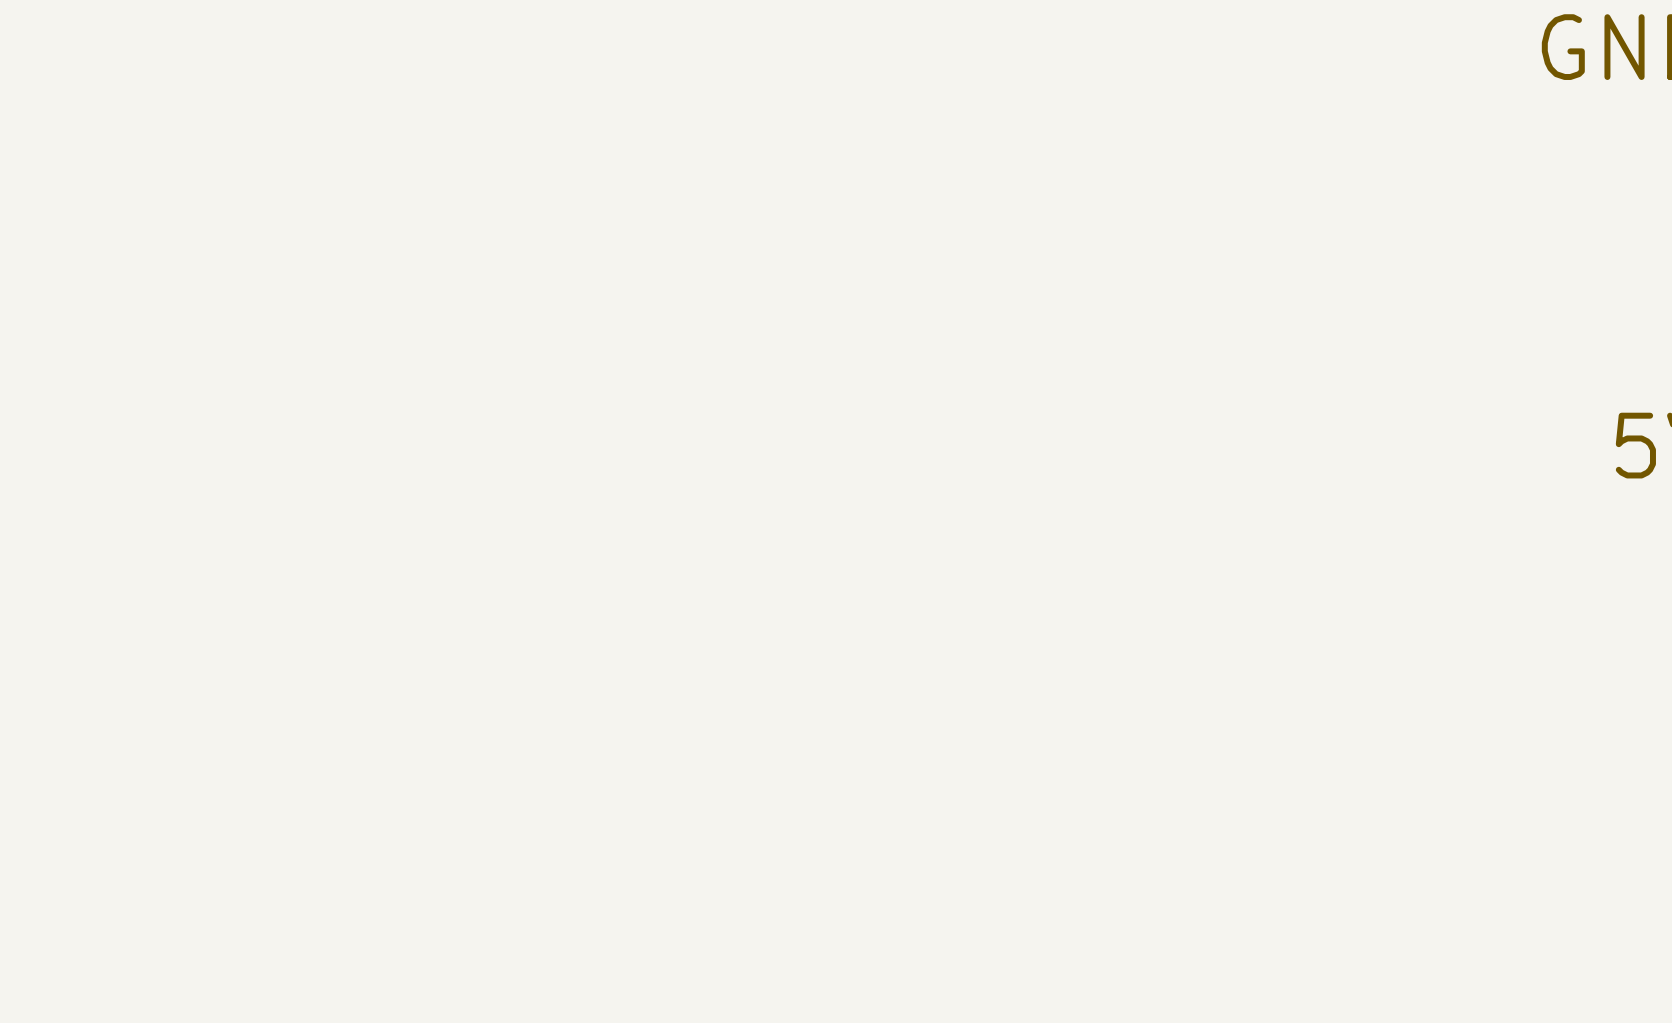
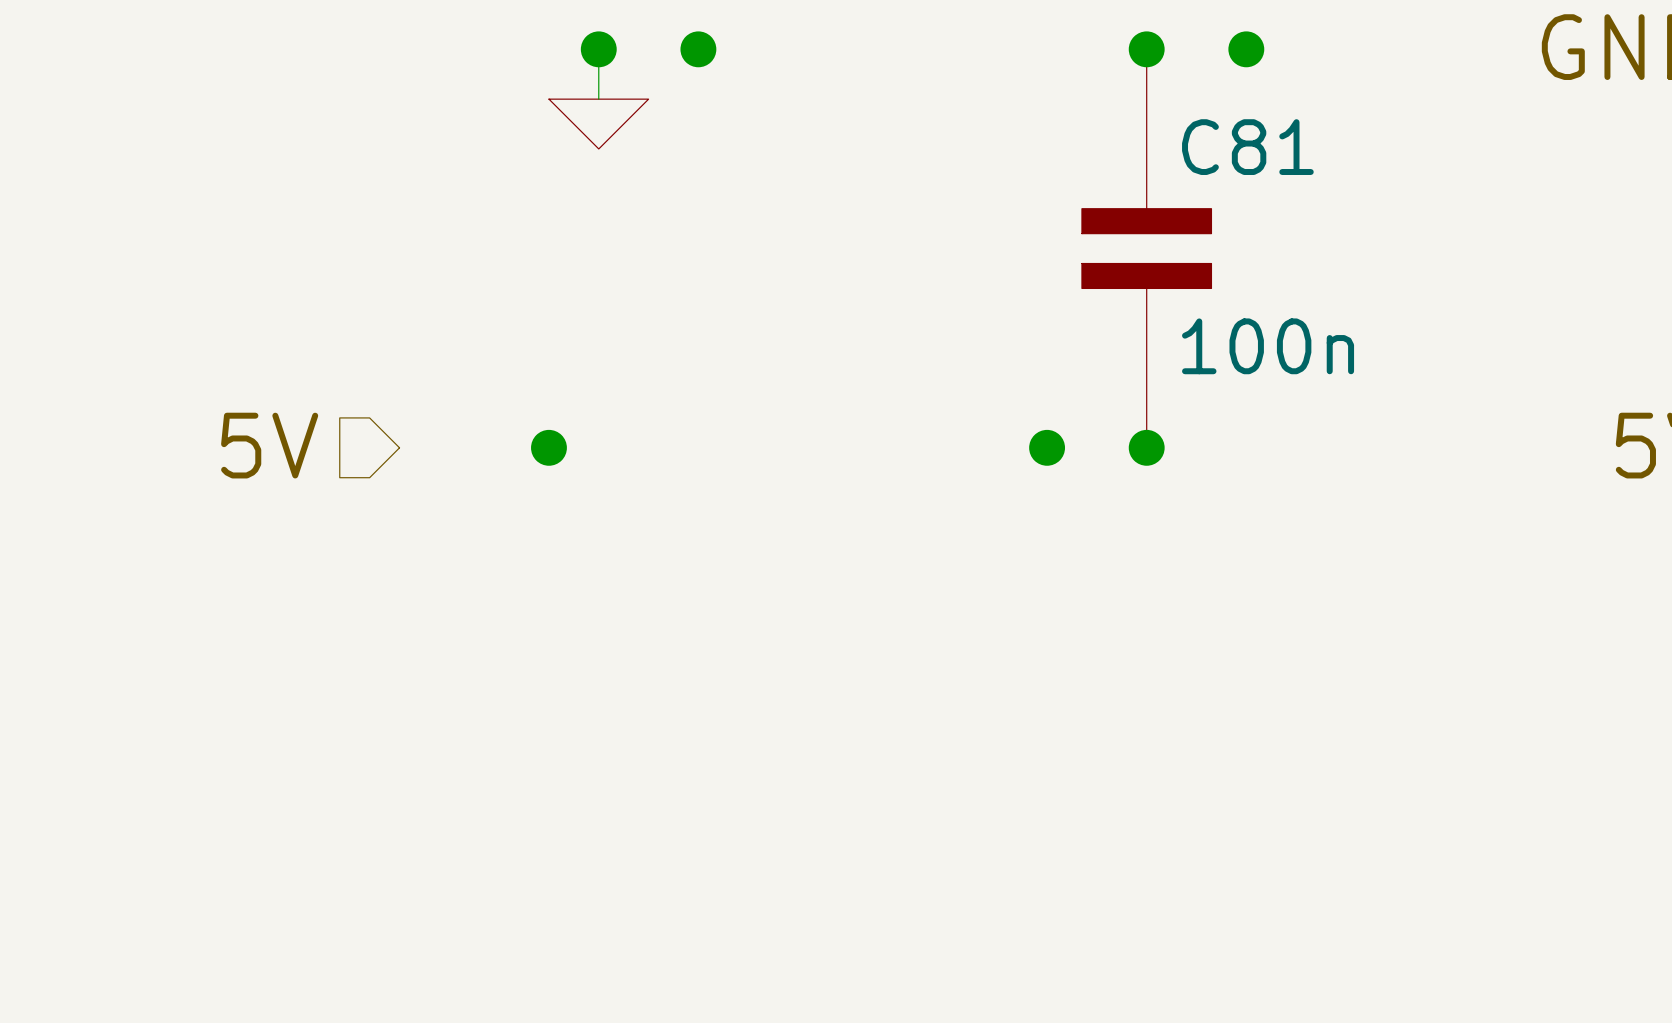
wire: none -> (598, 49) (598, 99)
junction: none -> (598, 49)
junction: none -> (698, 49)
junction: none -> (1146, 49)
junction: none -> (1246, 49)
power symbol: none -> (598, 124)
C81: none -> 100n (1146, 248)
hierarchical label: none -> 5V (269, 445)
junction: none -> (548, 447)
junction: none -> (1047, 447)
junction: none -> (1146, 447)

